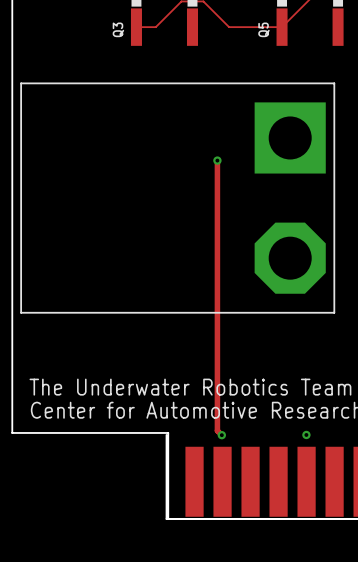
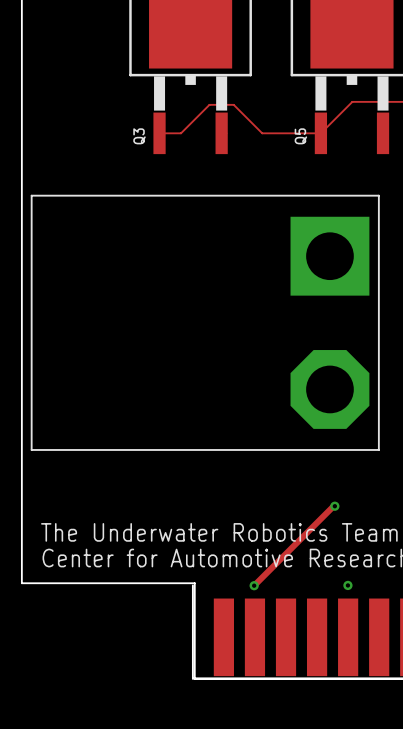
track: (217, 160) (217, 430) (221, 435) -> (334, 506) (254, 585)
via: (217, 160) -> none
via: none -> (334, 506)

